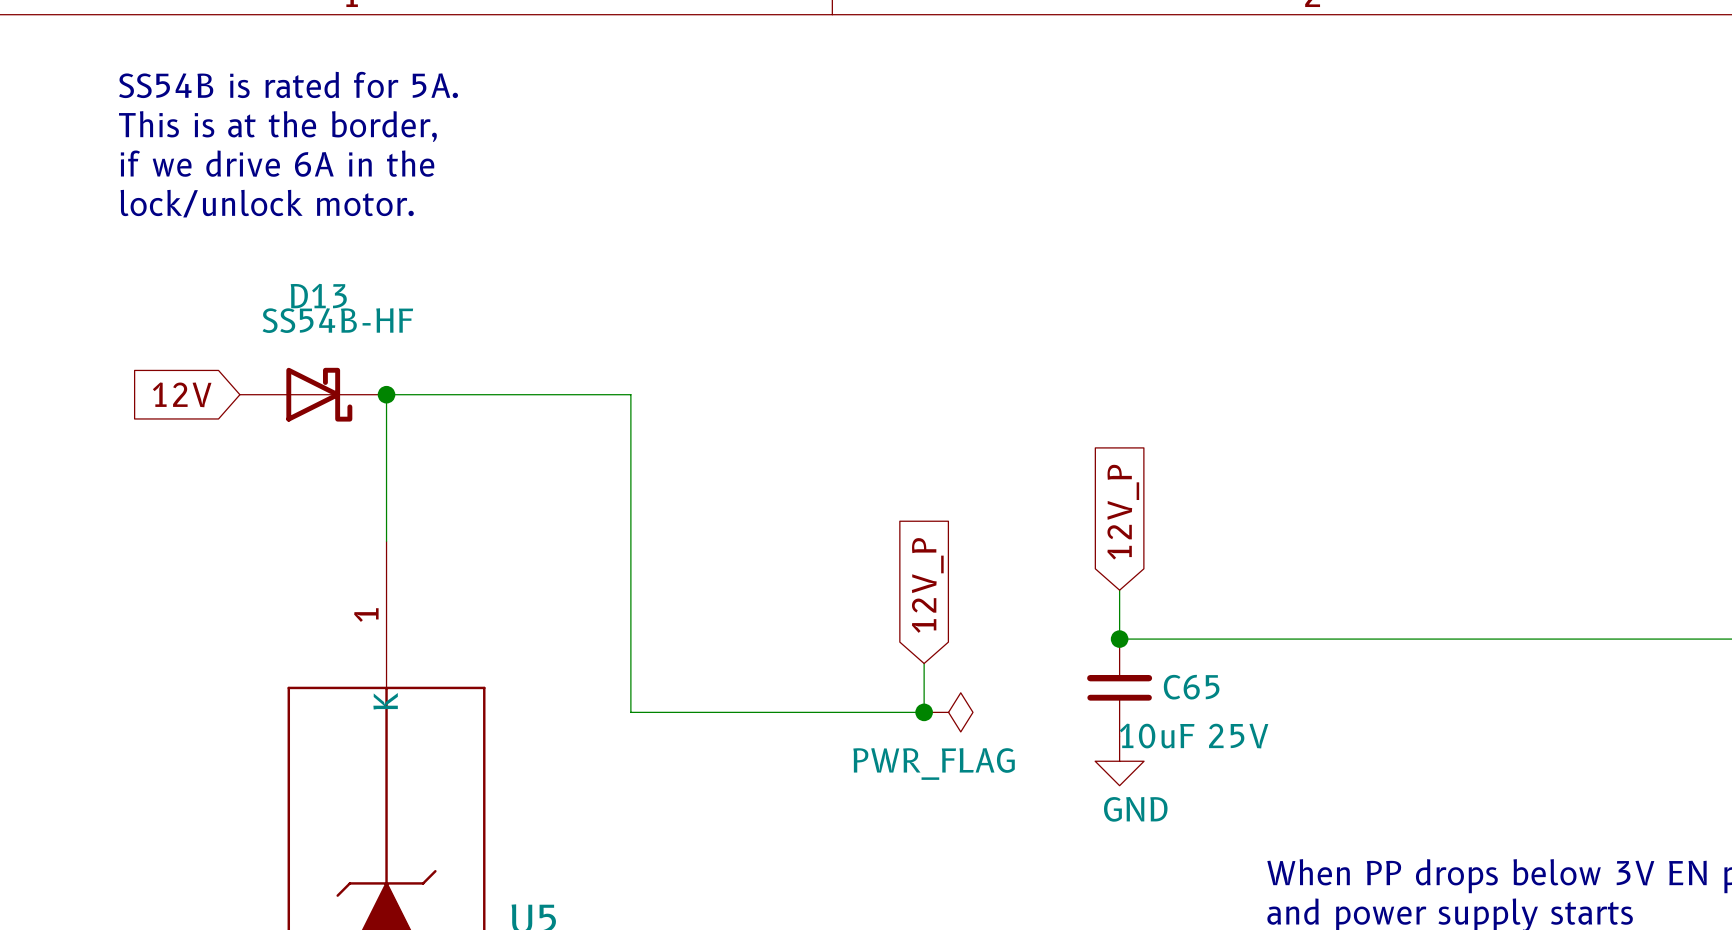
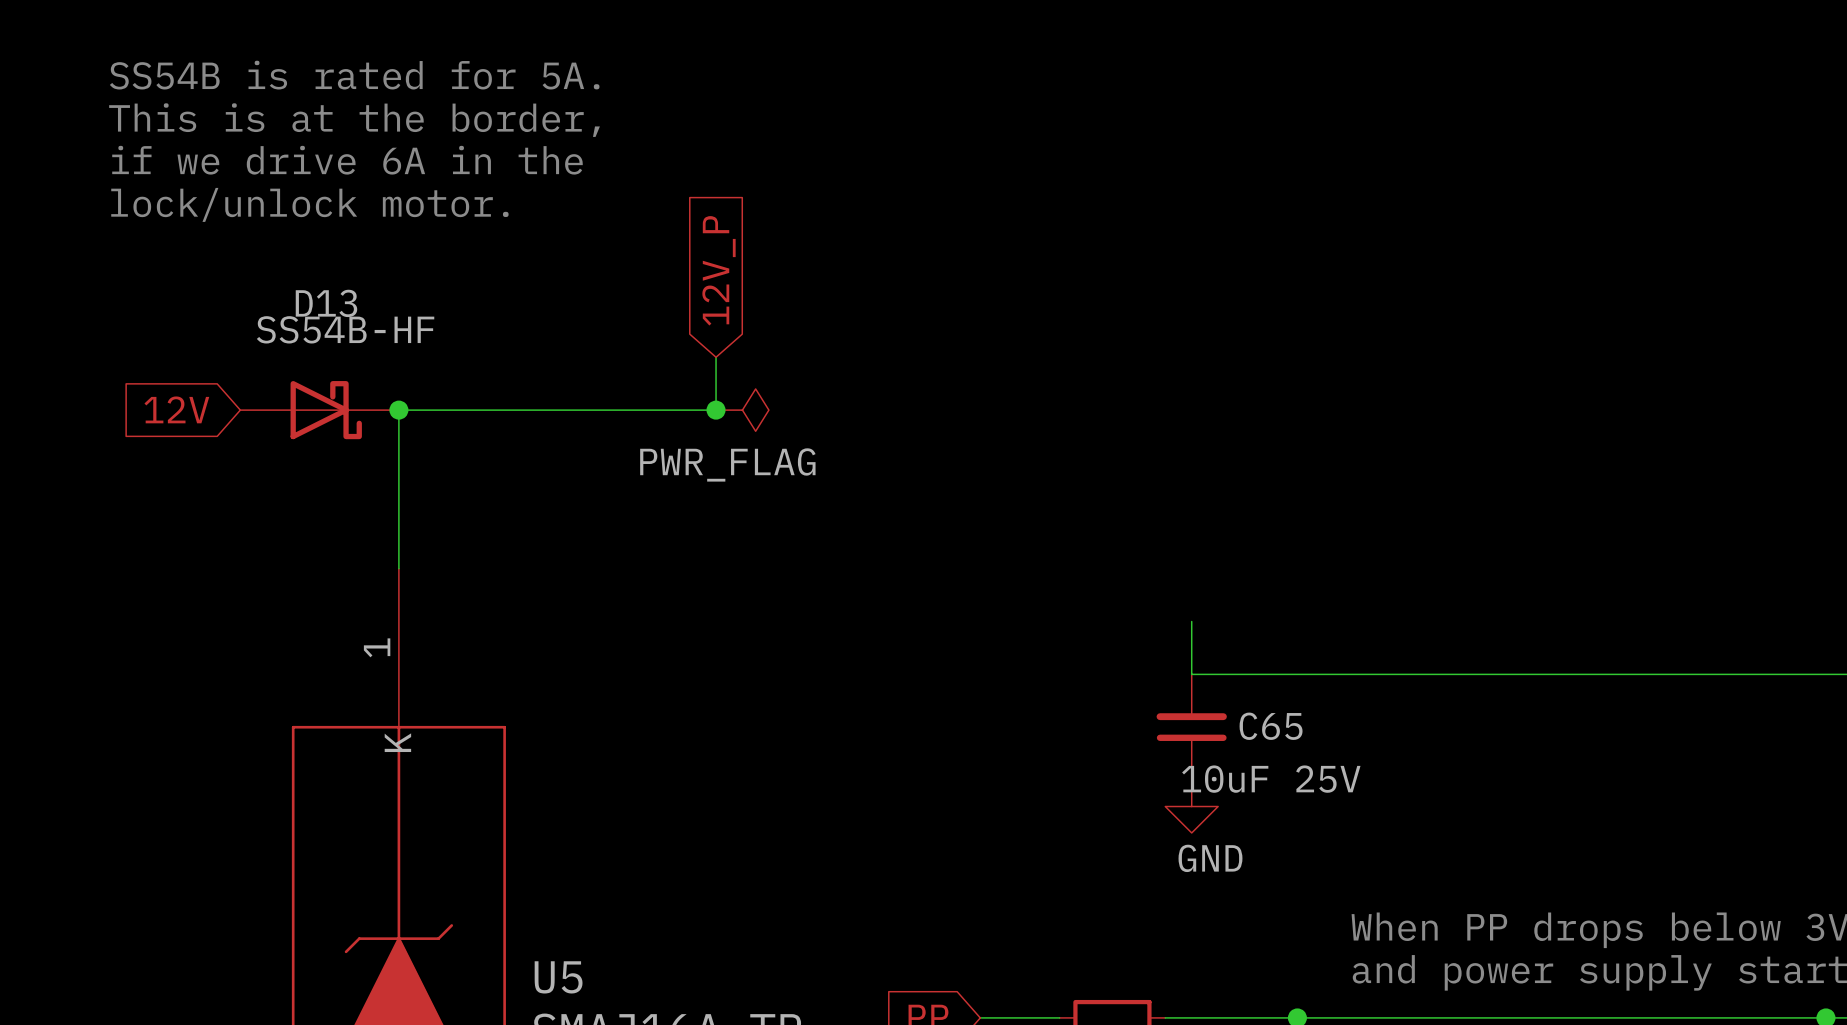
global label: none -> 12V_P (719, 270)
wire: (630, 394) (630, 712) (924, 712) (924, 663) -> (663, 410) (716, 410) (716, 357)
junction: none -> (716, 410)
global label: 12V_P (1123, 512) -> none
global label: 12V_P (927, 585) -> none
junction: (1119, 639) -> none
junction: (924, 712) -> none
power symbol position: PWR_FLAG (948, 712) -> PWR_FLAG (742, 410)

